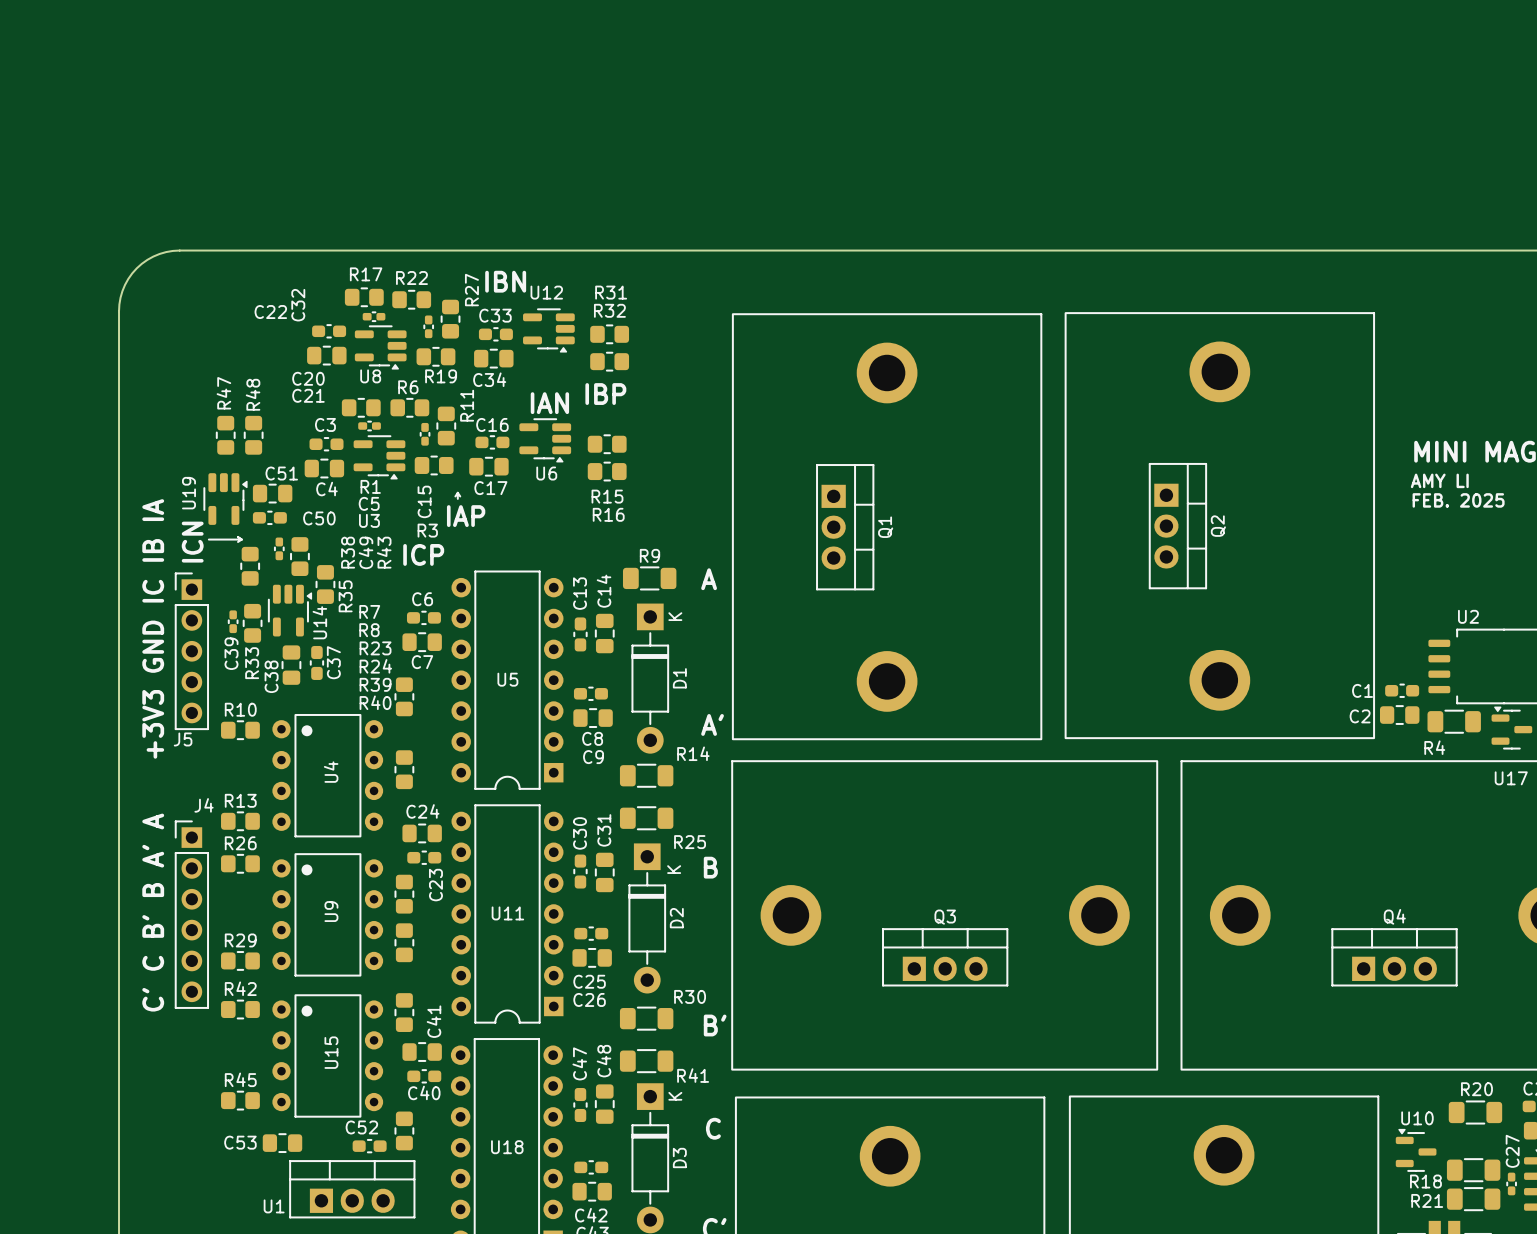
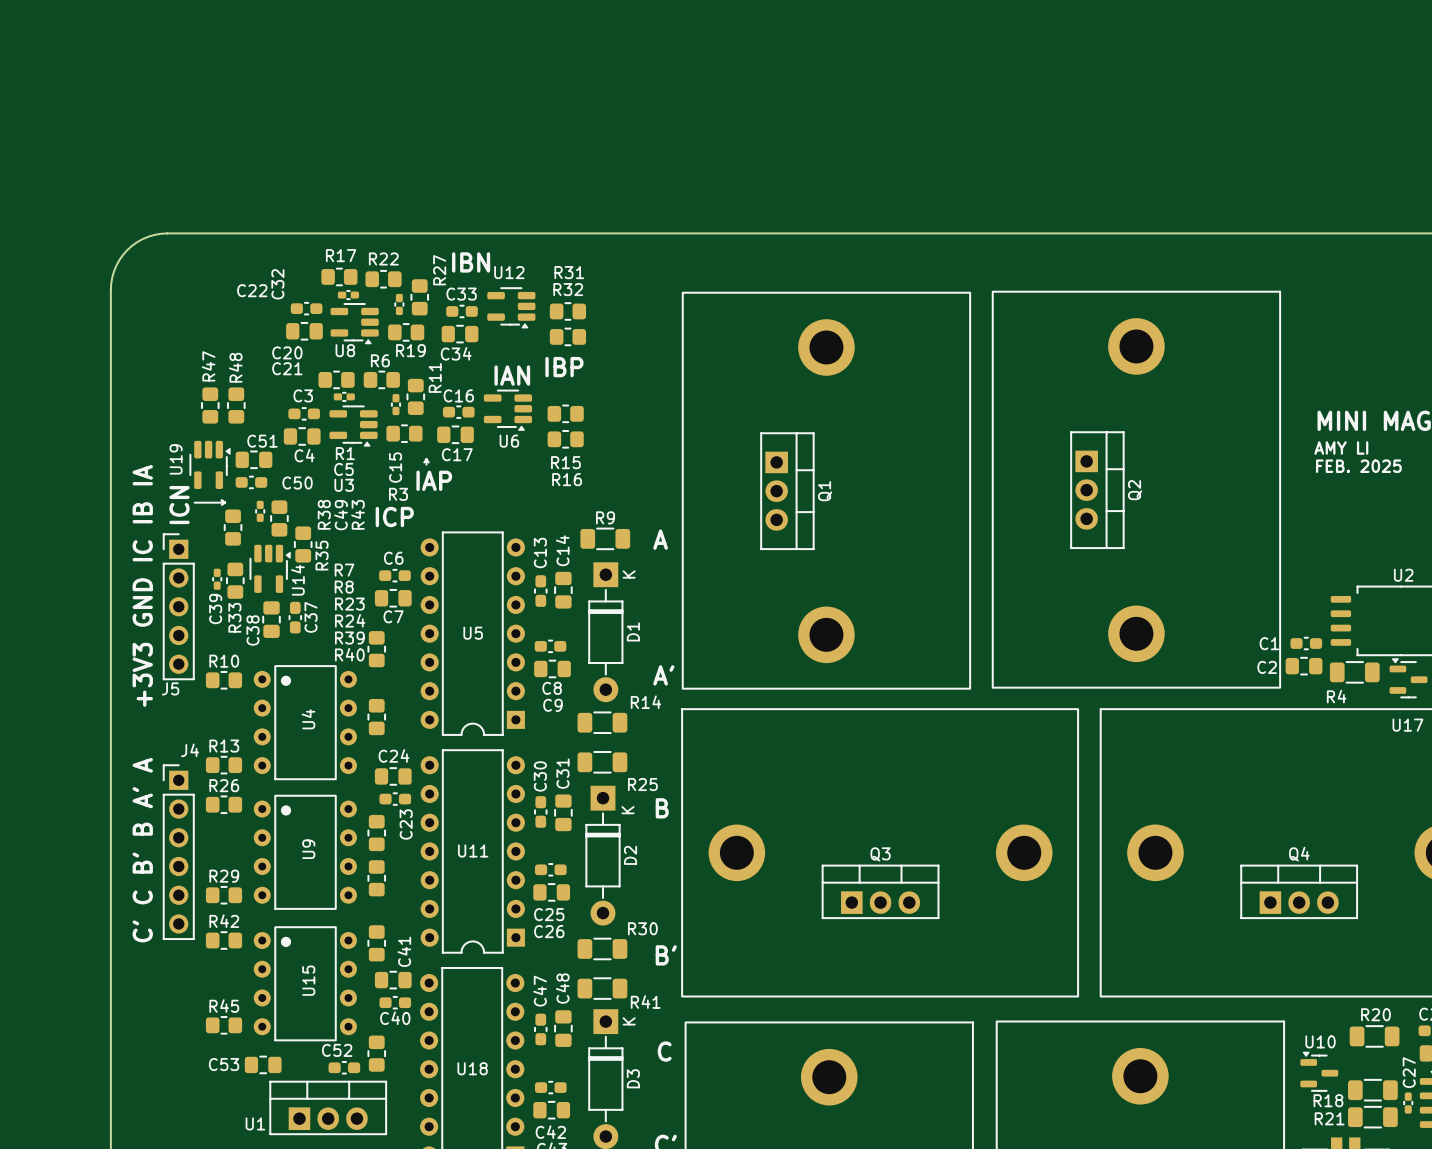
U2 name position: U2 (1468, 616) -> U2 (1403, 575)

